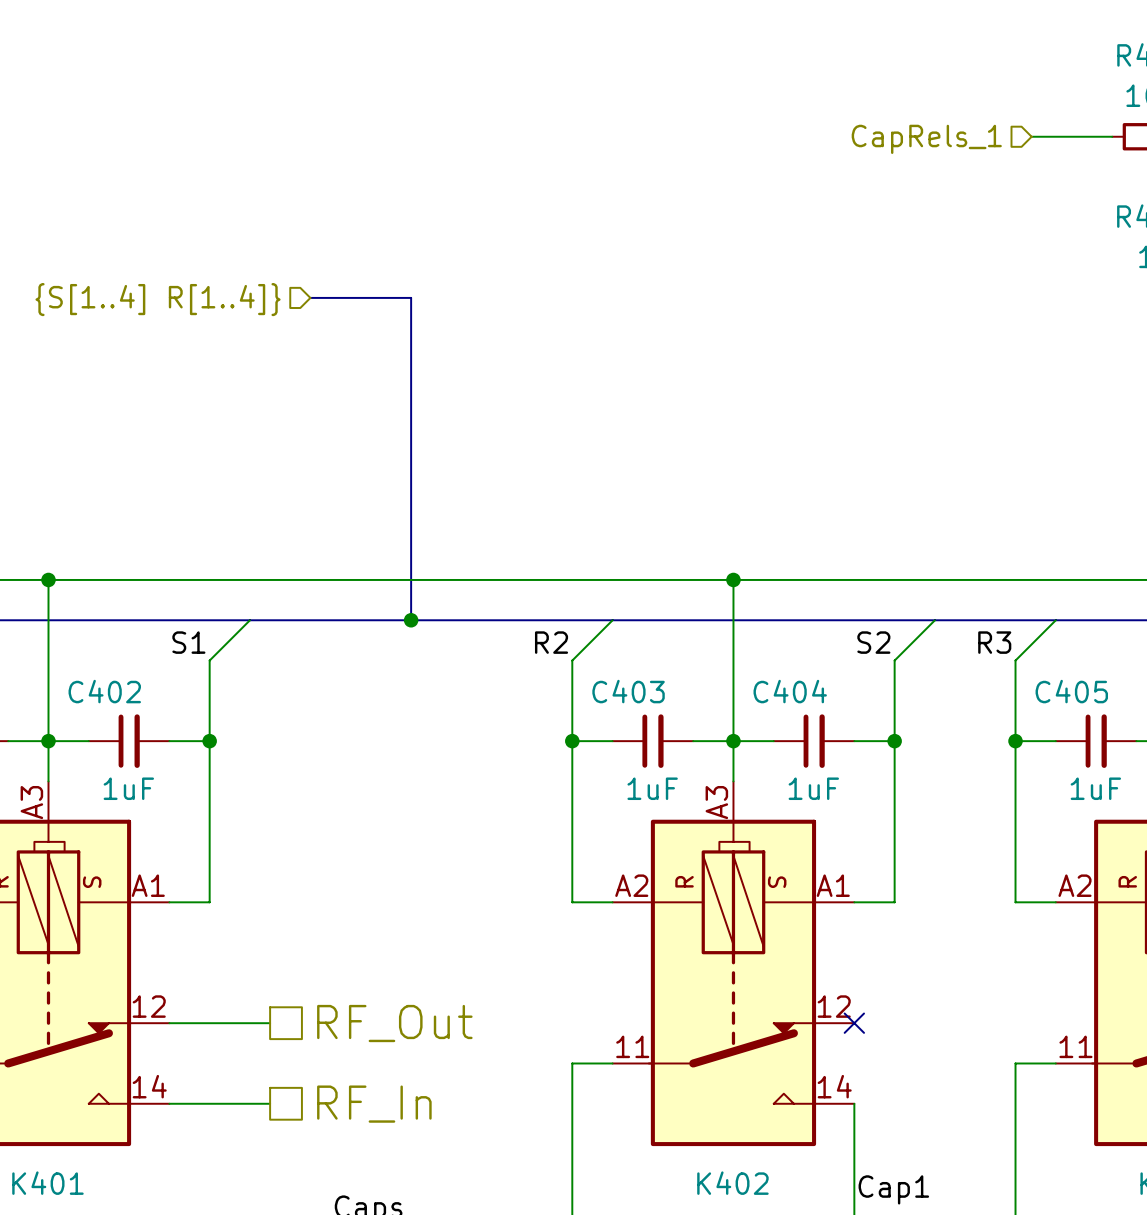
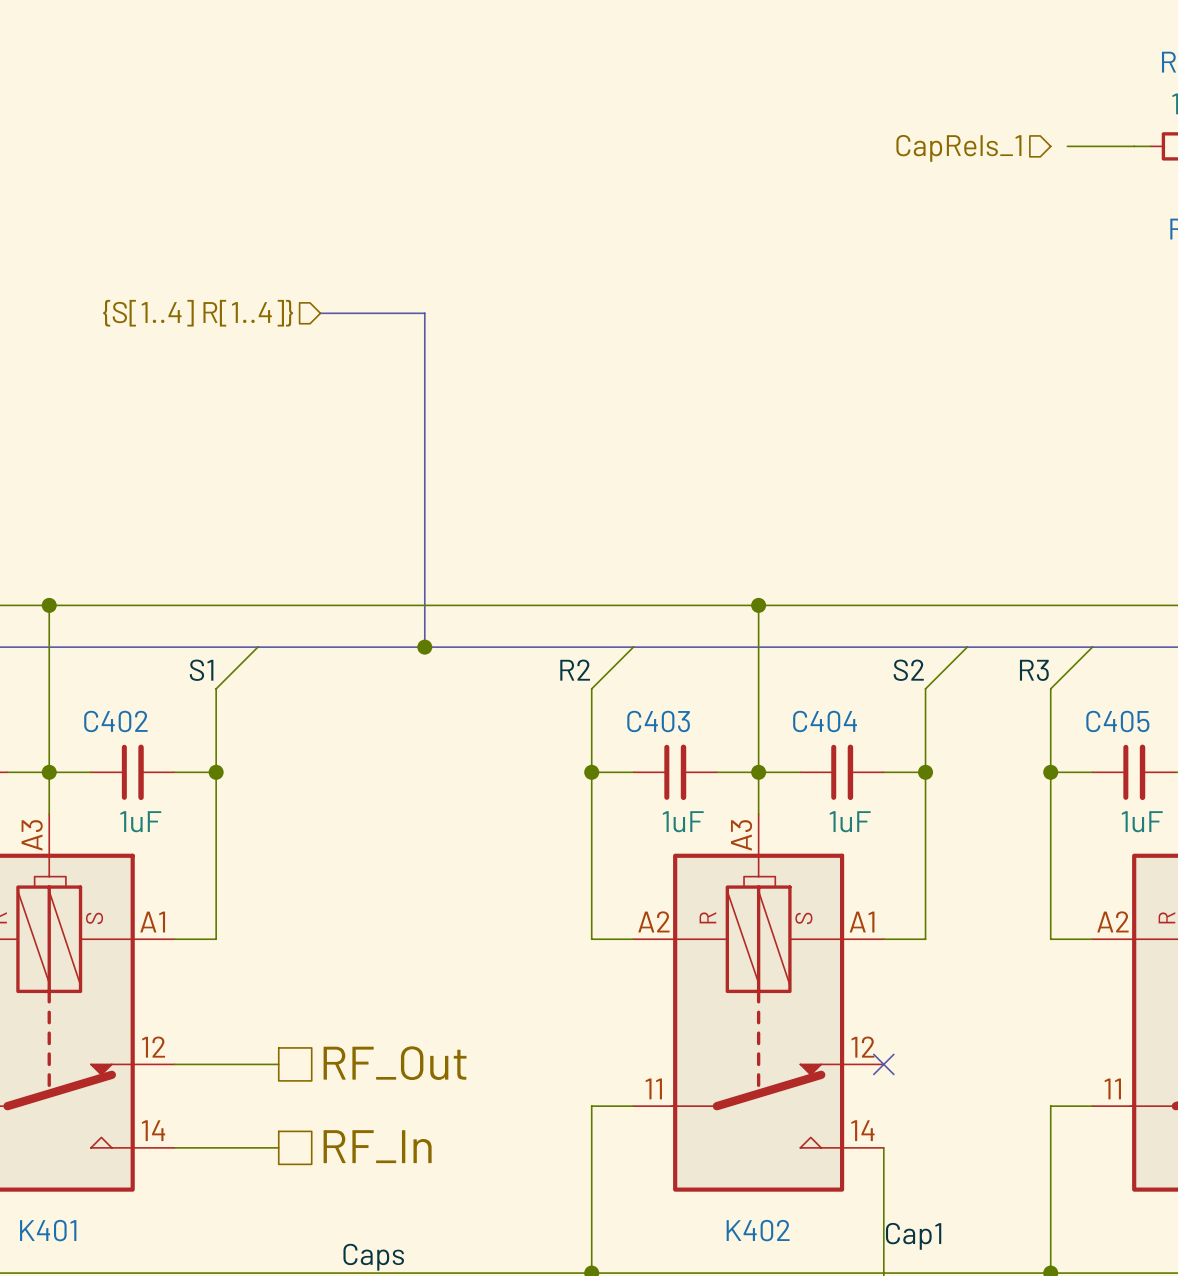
hierarchical label position: CapRels_1 (926, 139) -> CapRels_1 (958, 148)

